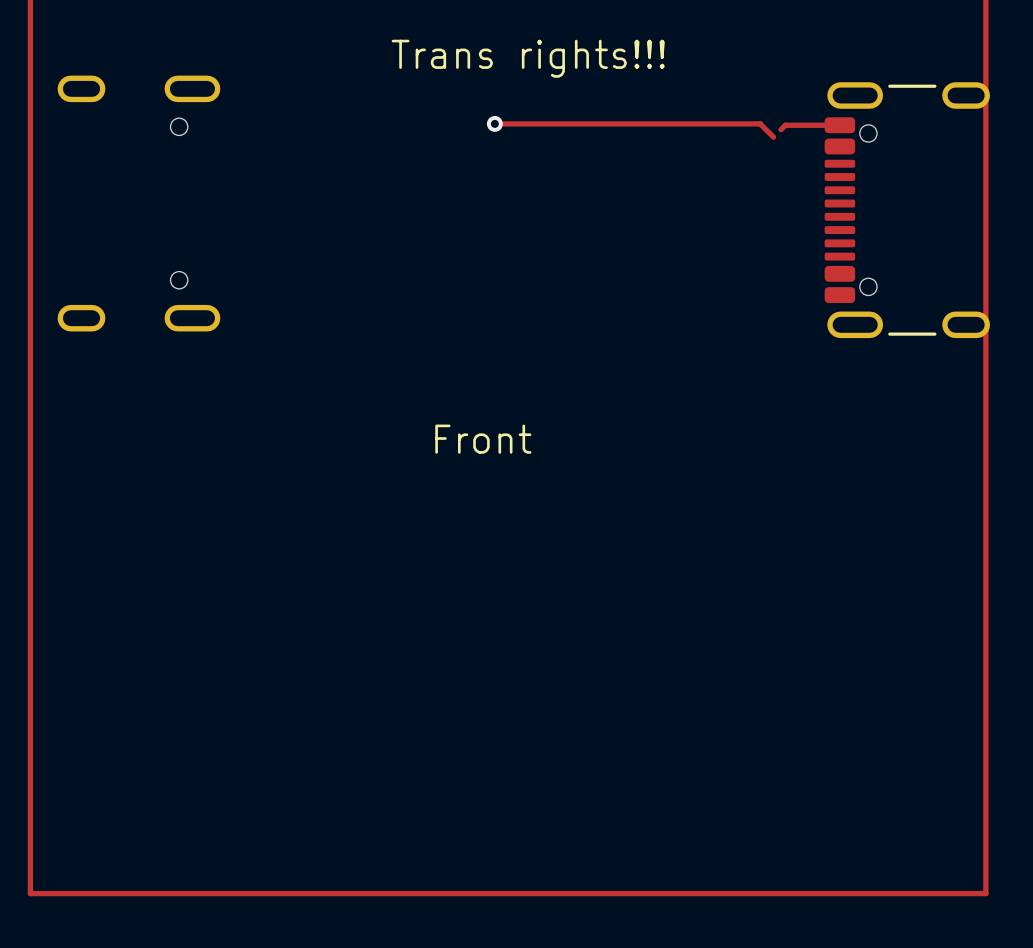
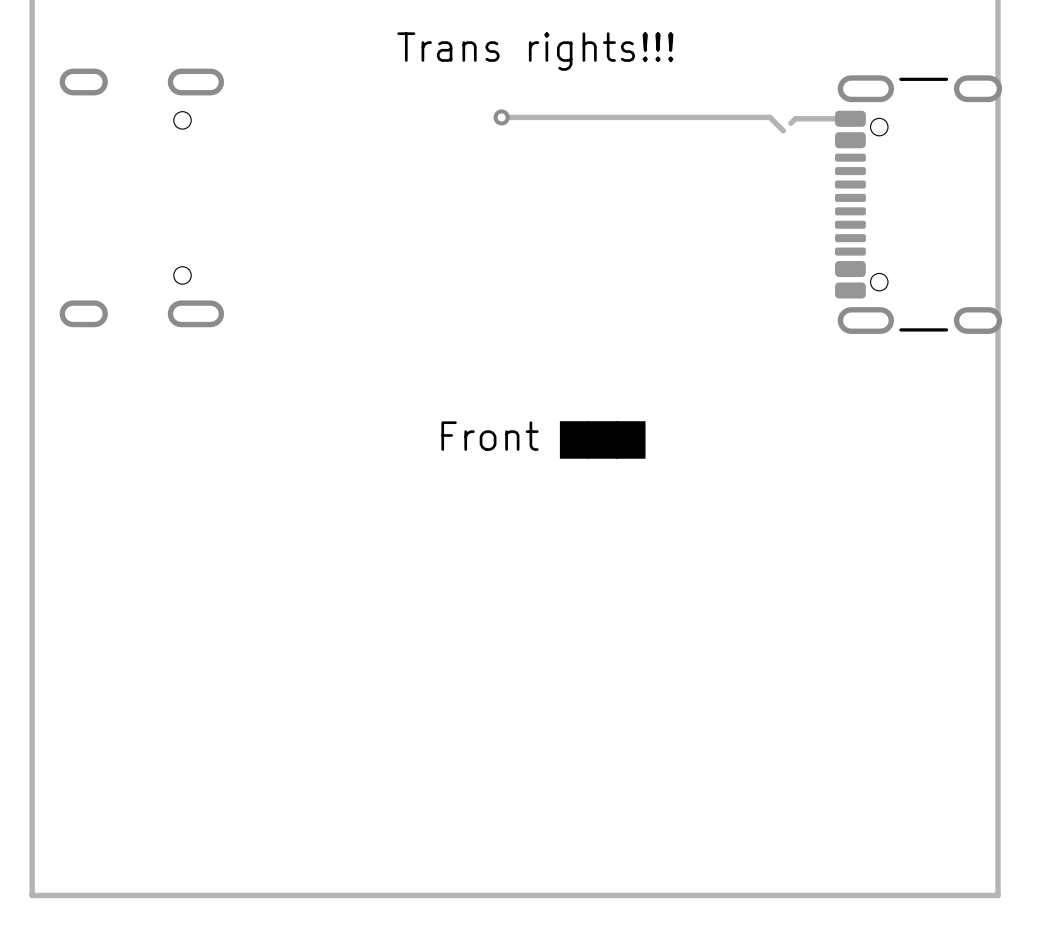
text: Front (483, 439) -> Front ███ (544, 439)

